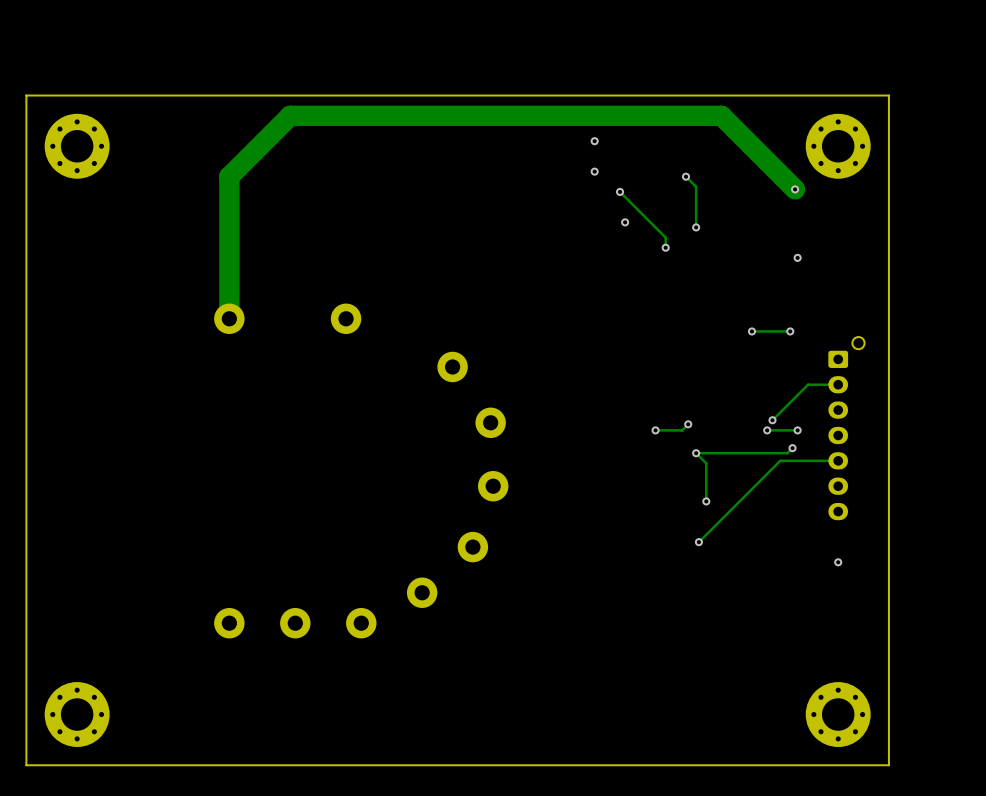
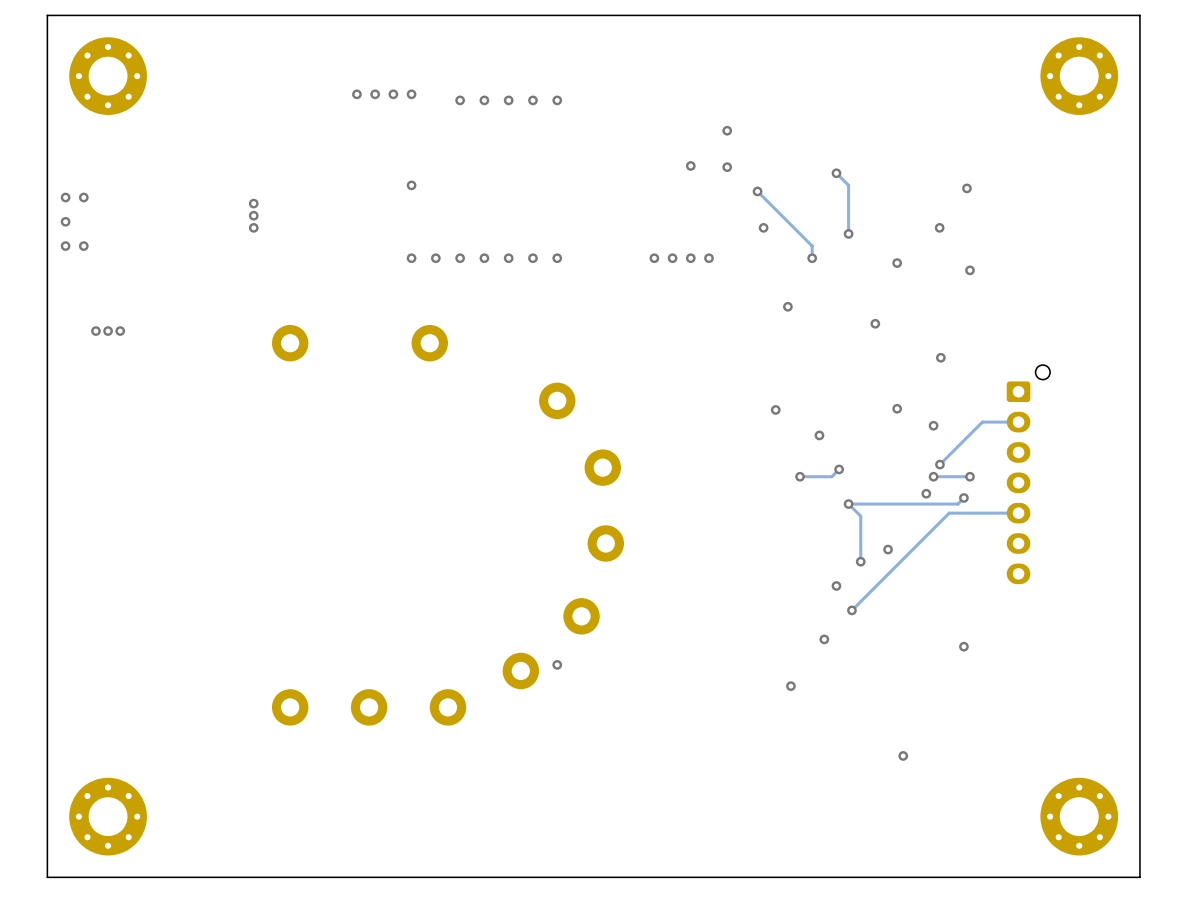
board edge: (26, 95) (888, 95) (888, 765) -> (47, 76) (47, 15) (1139, 15) (1139, 877) (1079, 877)
via: none -> (356, 94)
via: none -> (375, 94)
via: none -> (393, 94)
via: none -> (411, 94)
via: none -> (460, 100)
via: none -> (484, 100)
via: none -> (508, 100)
via: none -> (532, 100)
via: none -> (557, 100)
part position: (77, 146) -> (108, 76)
part position: (838, 146) -> (1079, 76)
via: none -> (690, 165)
via: none -> (411, 185)
track: (795, 189) (721, 115) (290, 115) (229, 176) (229, 318) -> none
via: none -> (65, 197)
via: none -> (83, 197)
via: none -> (253, 203)
via: none -> (253, 215)
via: none -> (65, 221)
via: none -> (253, 227)
via: none -> (939, 227)
via: none -> (65, 246)
via: none -> (83, 246)
via: none -> (411, 258)
via: none -> (435, 258)
via: none -> (460, 258)
via: none -> (484, 258)
via: none -> (508, 258)
via: none -> (532, 258)
via: none -> (557, 258)
via: none -> (654, 258)
via: none -> (672, 258)
via: none -> (690, 258)
via: none -> (708, 258)
via: none -> (897, 263)
via: none -> (787, 306)
via: none -> (875, 323)
via: none -> (95, 331)
via: none -> (108, 331)
via: none -> (120, 331)
via: none -> (940, 357)
via: (751, 331) -> none
track: (790, 331) (751, 331) -> none
via: (790, 331) -> none
via: none -> (897, 408)
via: none -> (775, 409)
via: none -> (933, 425)
via: none -> (819, 435)
via: none -> (926, 493)
via: none -> (888, 549)
via: none -> (836, 585)
via position: (838, 562) -> (963, 646)
via: none -> (824, 639)
via: none -> (557, 664)
via: none -> (790, 686)
via: none -> (903, 755)
part position: (838, 714) -> (1079, 816)

